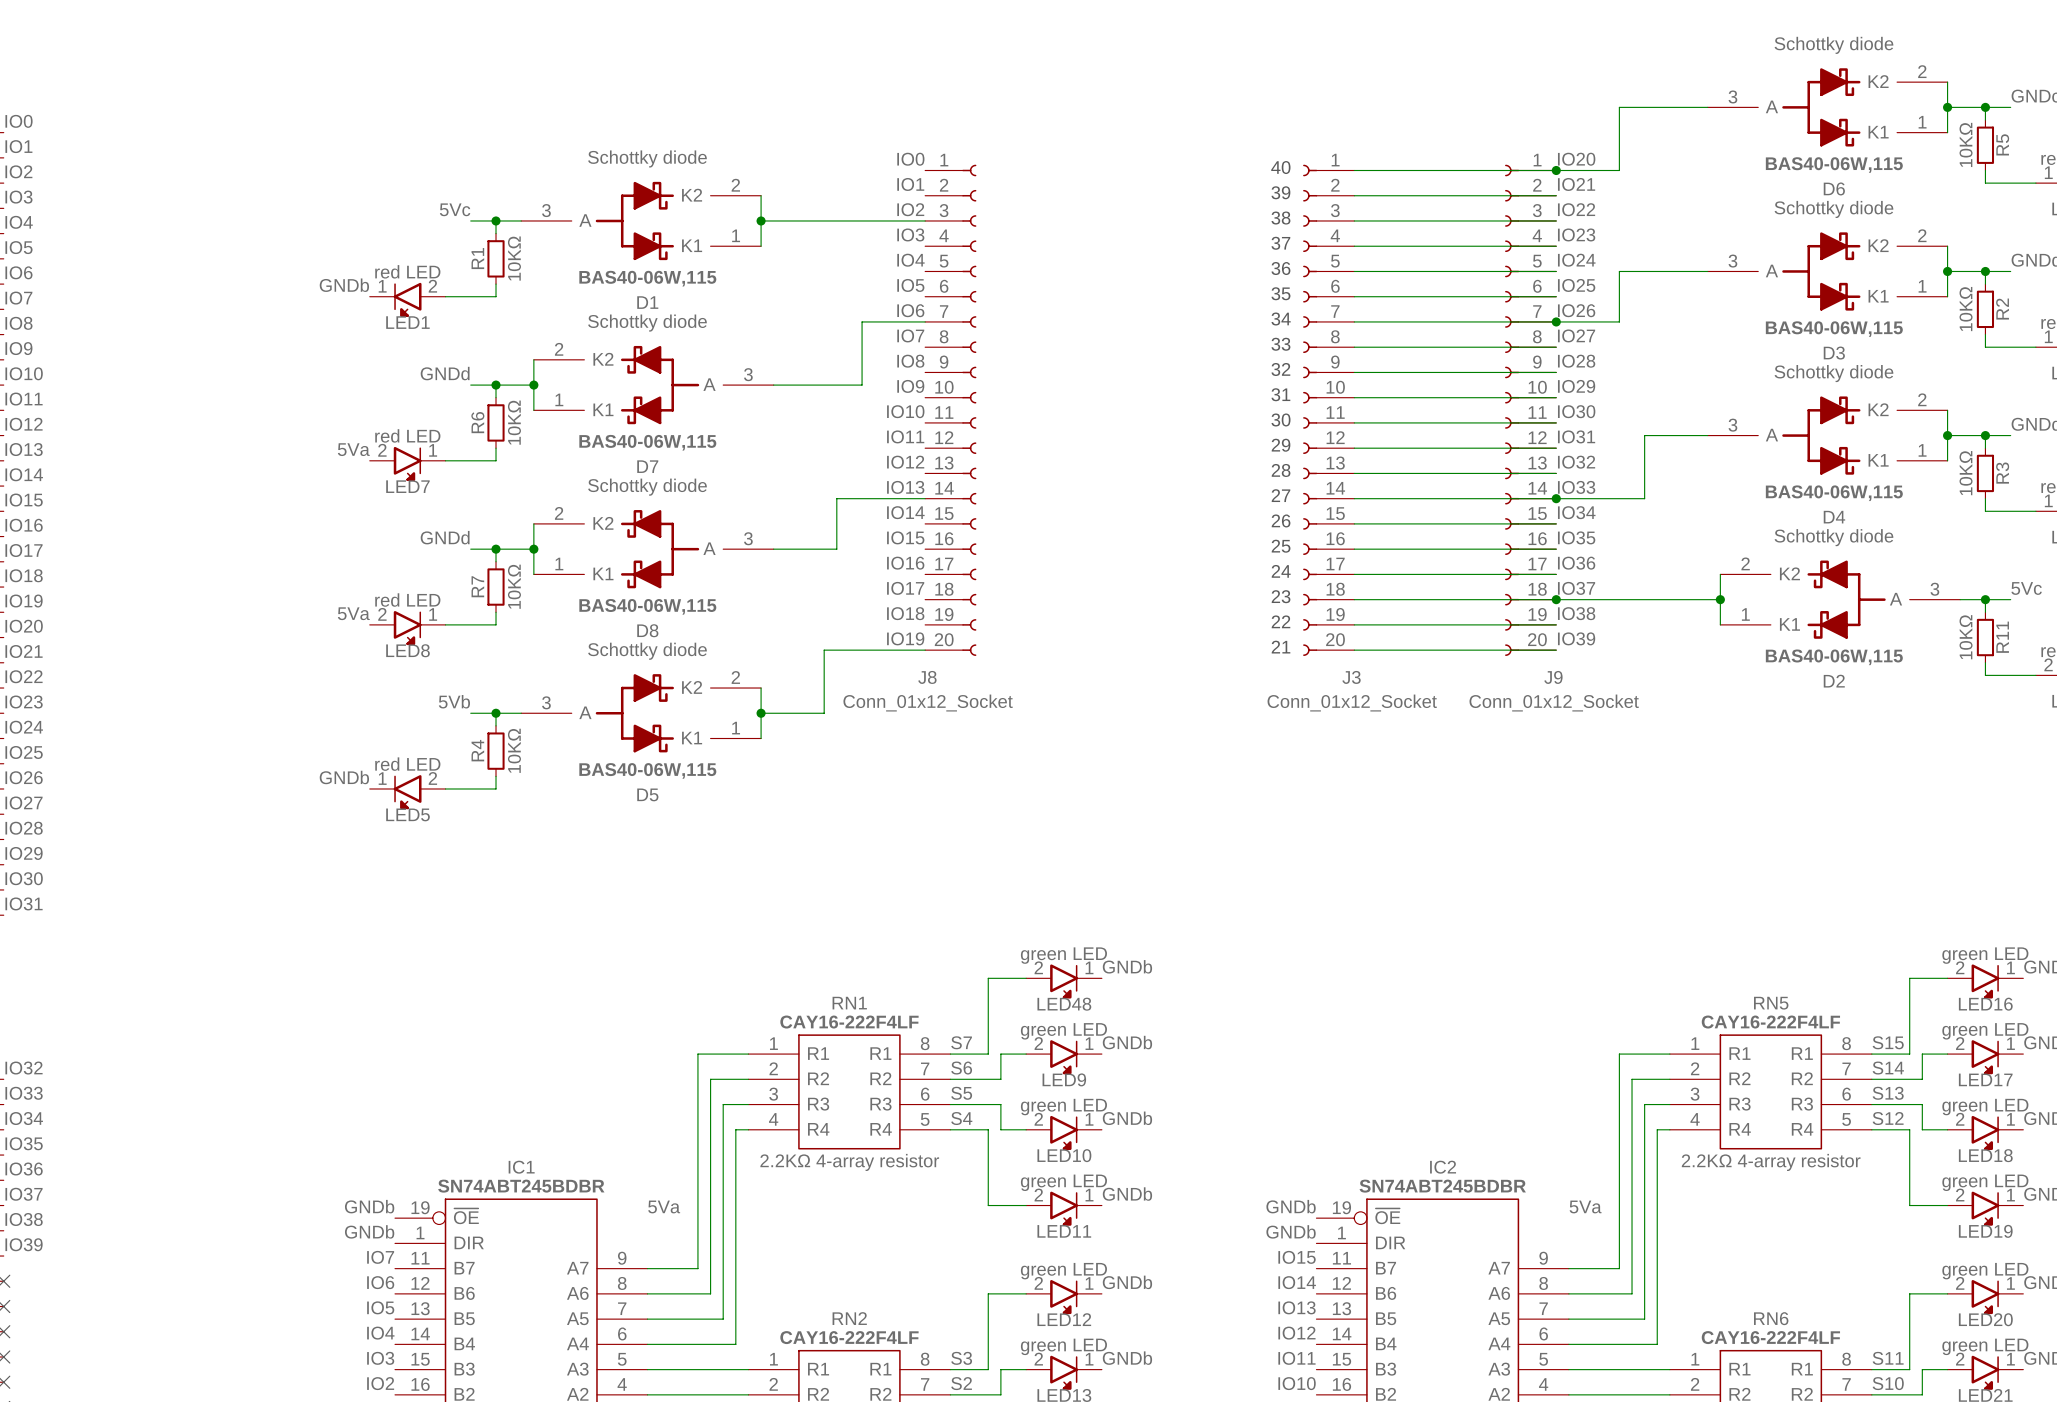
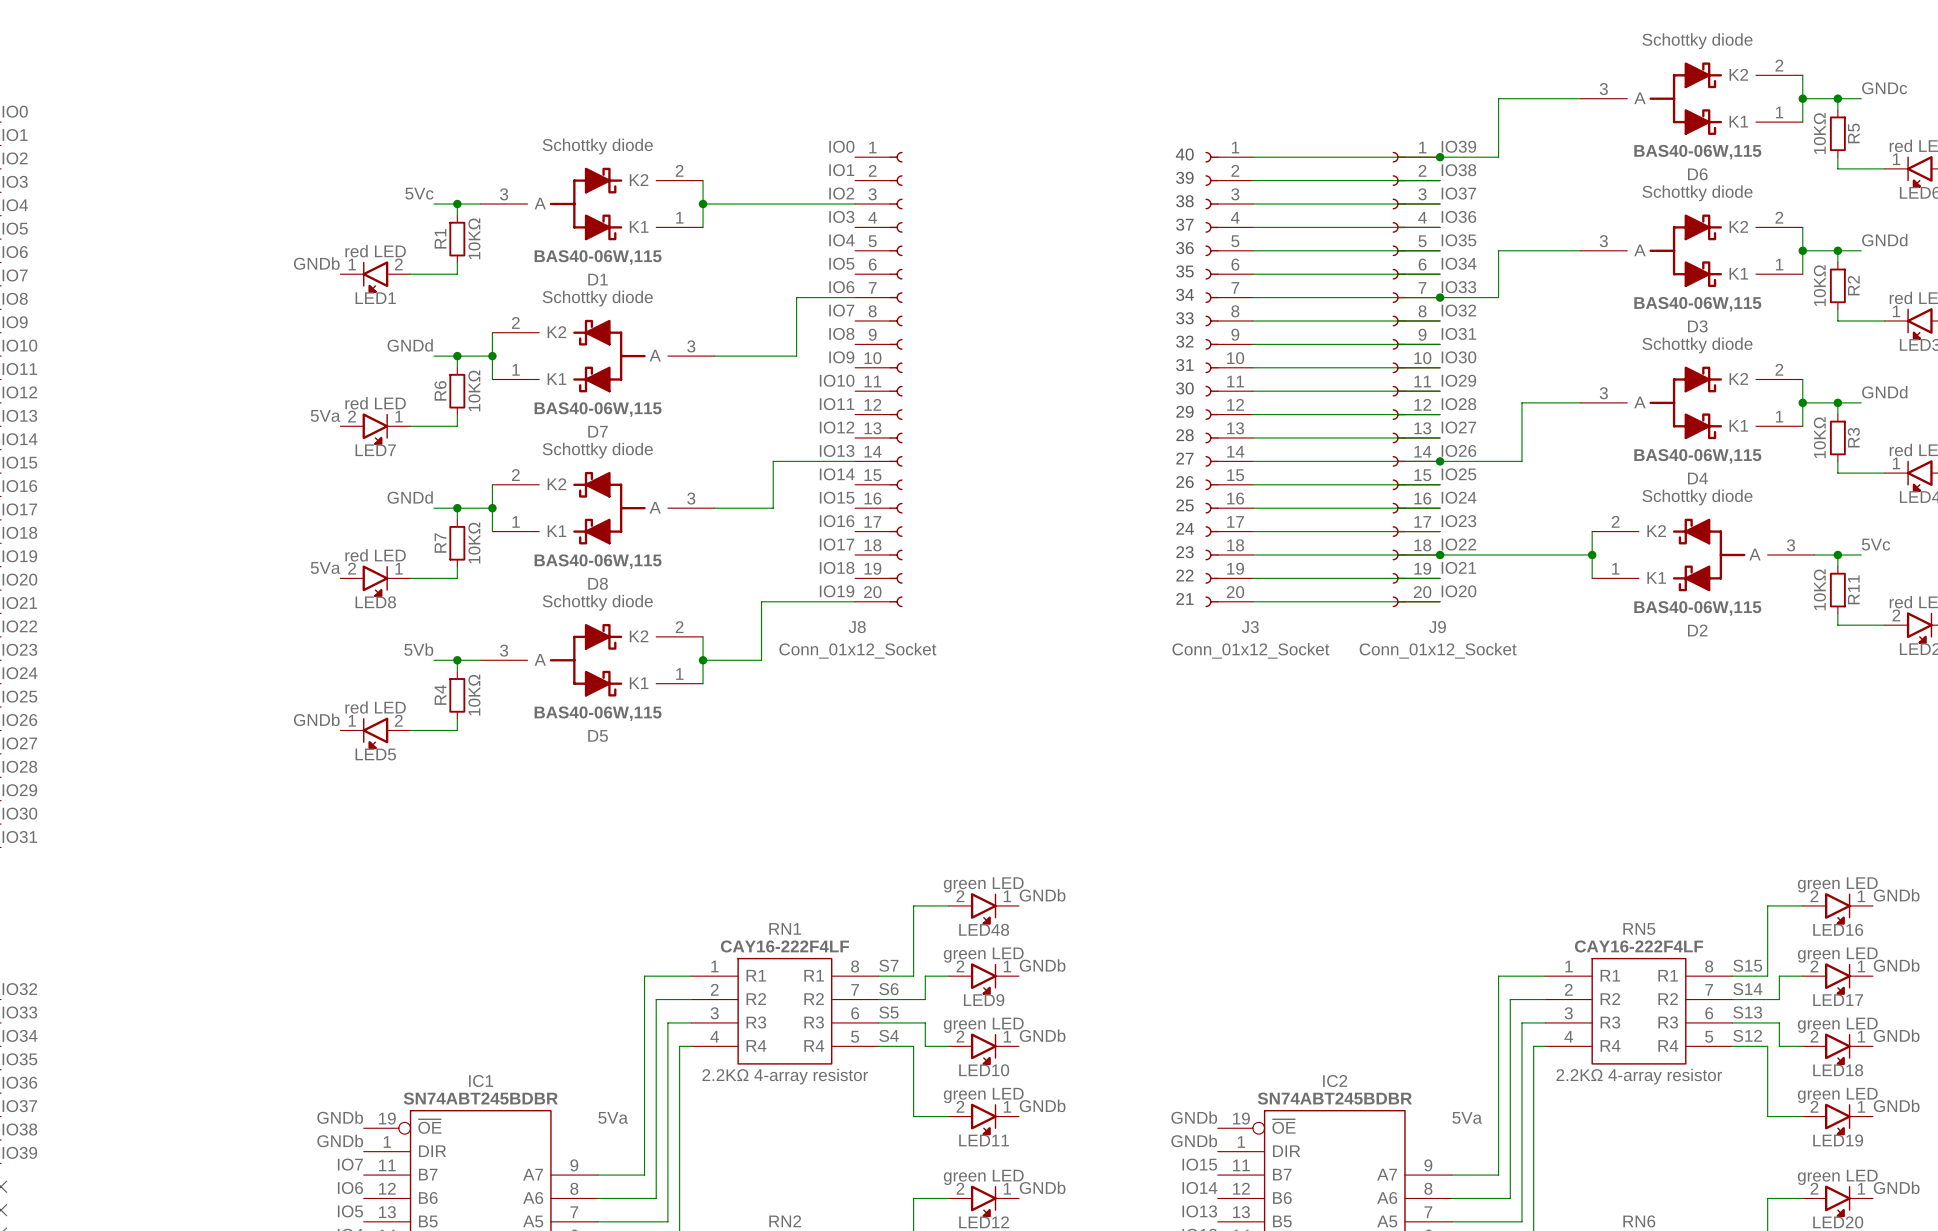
label: IO20 (1576, 159) -> IO39 (1458, 146)
label: IO21 (1576, 184) -> IO38 (1458, 170)
label: IO22 (1576, 209) -> IO37 (1458, 193)
label: IO23 (1576, 234) -> IO36 (1458, 216)
label: IO24 (1576, 260) -> IO35 (1458, 240)
label: IO25 (1576, 285) -> IO34 (1459, 263)
label: IO26 (1576, 310) -> IO33 (1458, 287)
label: IO27 (1576, 335) -> IO32 (1458, 310)
label: IO28 (1576, 361) -> IO31 (1458, 333)
label: IO29 (1576, 386) -> IO30 (1458, 357)
label: IO30 (1576, 411) -> IO29 (1458, 380)
label: IO31 (1576, 436) -> IO28 (1458, 404)
label: IO32 (1576, 462) -> IO27 (1458, 427)
label: IO33 (1576, 487) -> IO26 (1458, 450)
label: IO34 (1576, 512) -> IO25 (1458, 474)
label: IO35 (1576, 537) -> IO24 (1459, 497)
label: IO36 (1576, 563) -> IO23 (1458, 521)
label: IO37 (1576, 588) -> IO22 (1458, 544)
label: IO38 (1576, 613) -> IO21 (1458, 567)
label: IO39 (1576, 638) -> IO20 (1458, 591)

